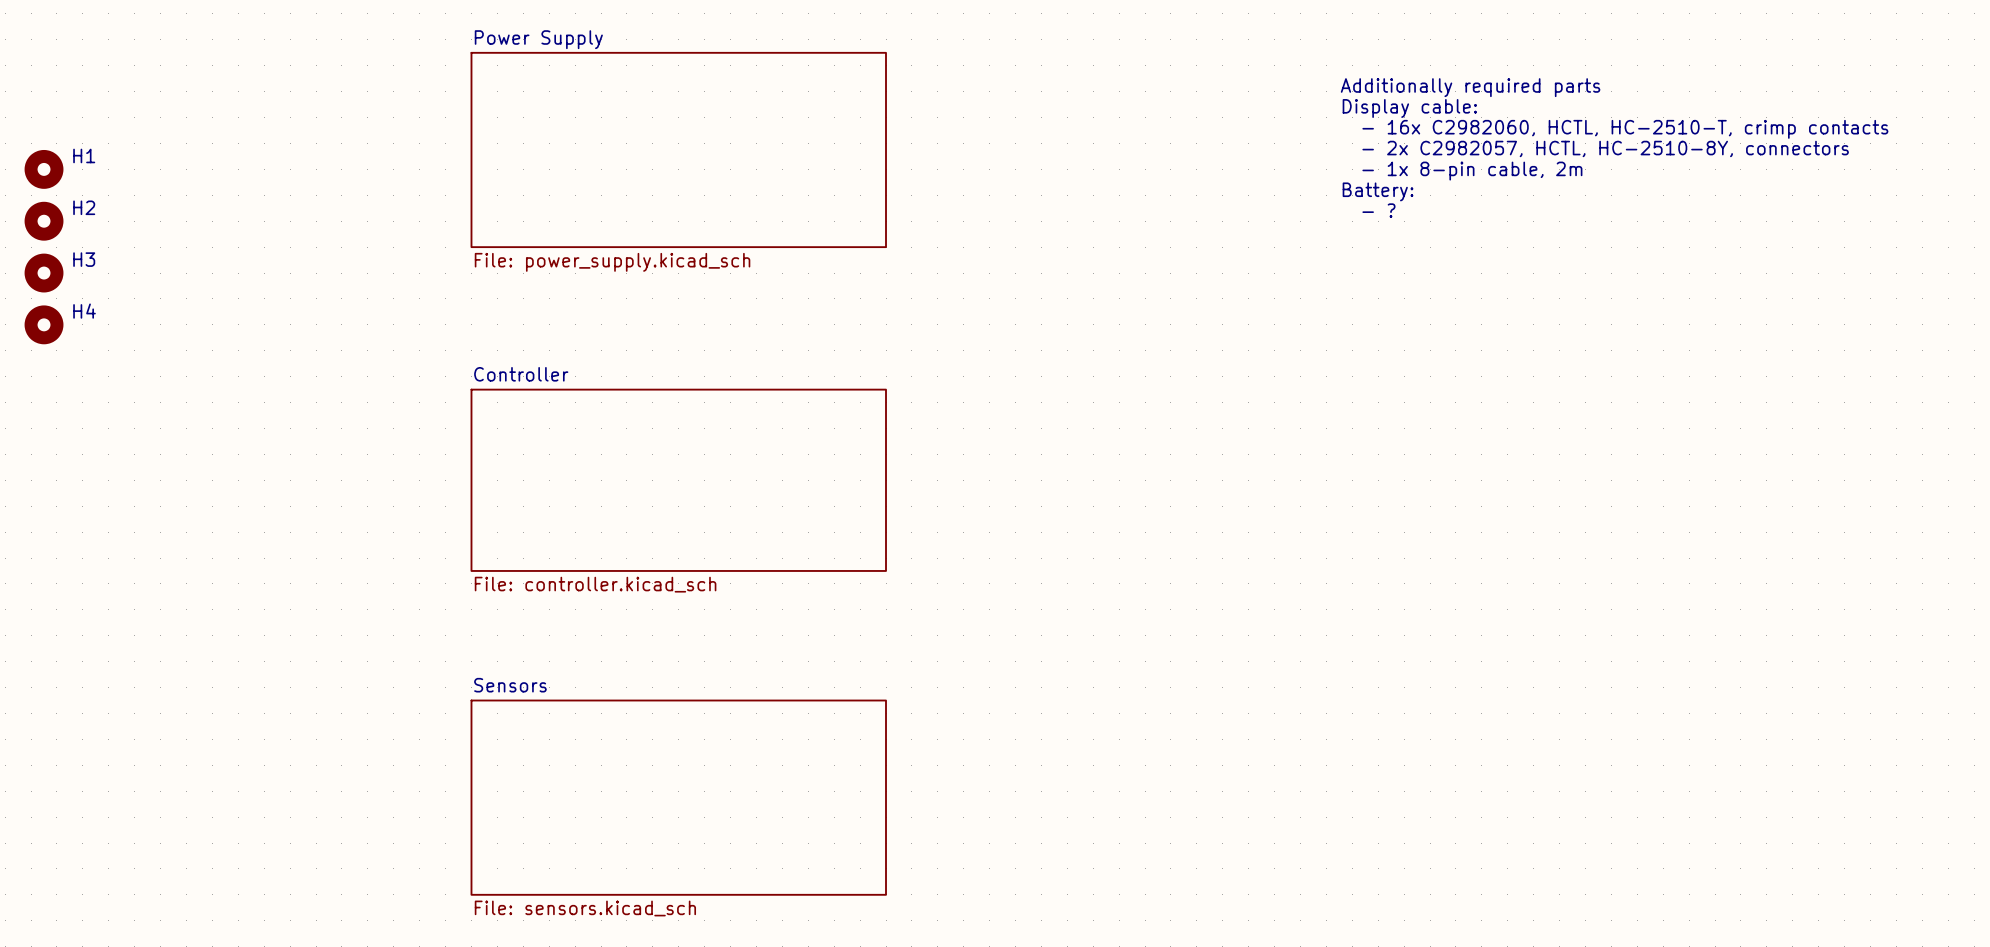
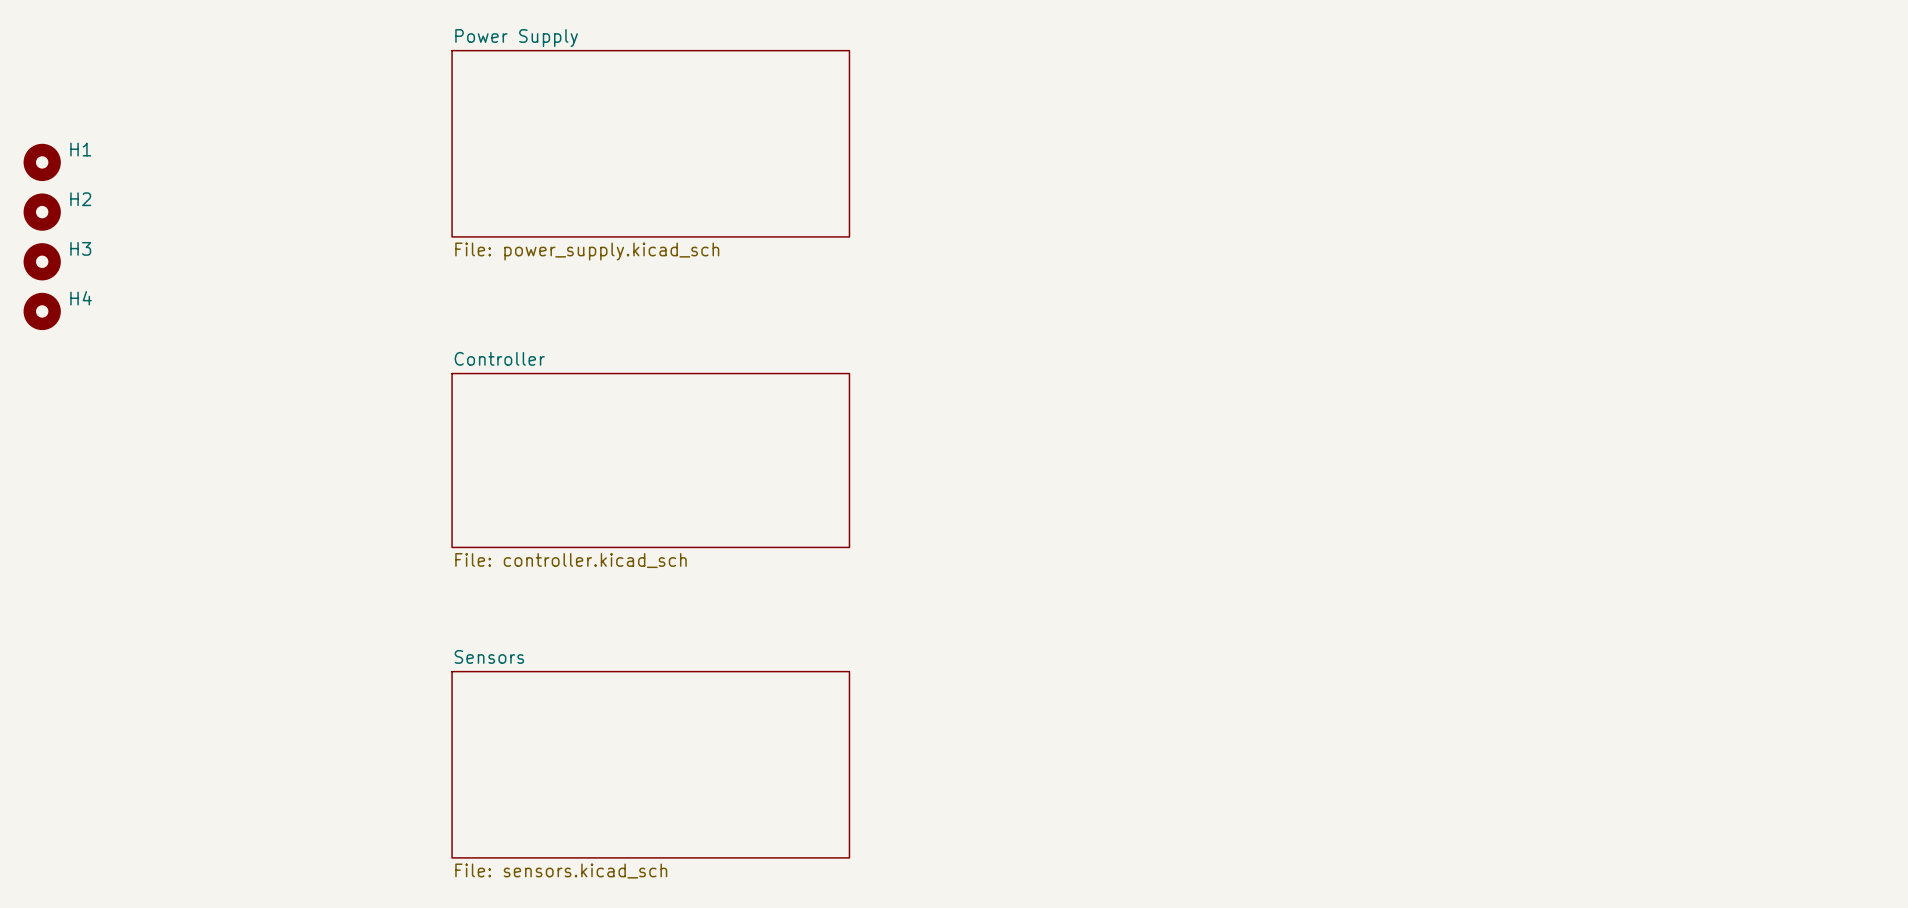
text: Additionally required parts (1470, 87) -> none
text: Display cable: (1409, 108) -> none
text: - 16x C2982060, HCTL, HC-2510-T, crimp contacts (1625, 129) -> none
text: - 2x C2982057, HCTL, HC-2510-8Y, connectors (1605, 148) -> none
text: - 1x 8-pin cable, 2m (1472, 171) -> none
text: Battery: (1378, 191) -> none
text: - ? (1378, 210) -> none

